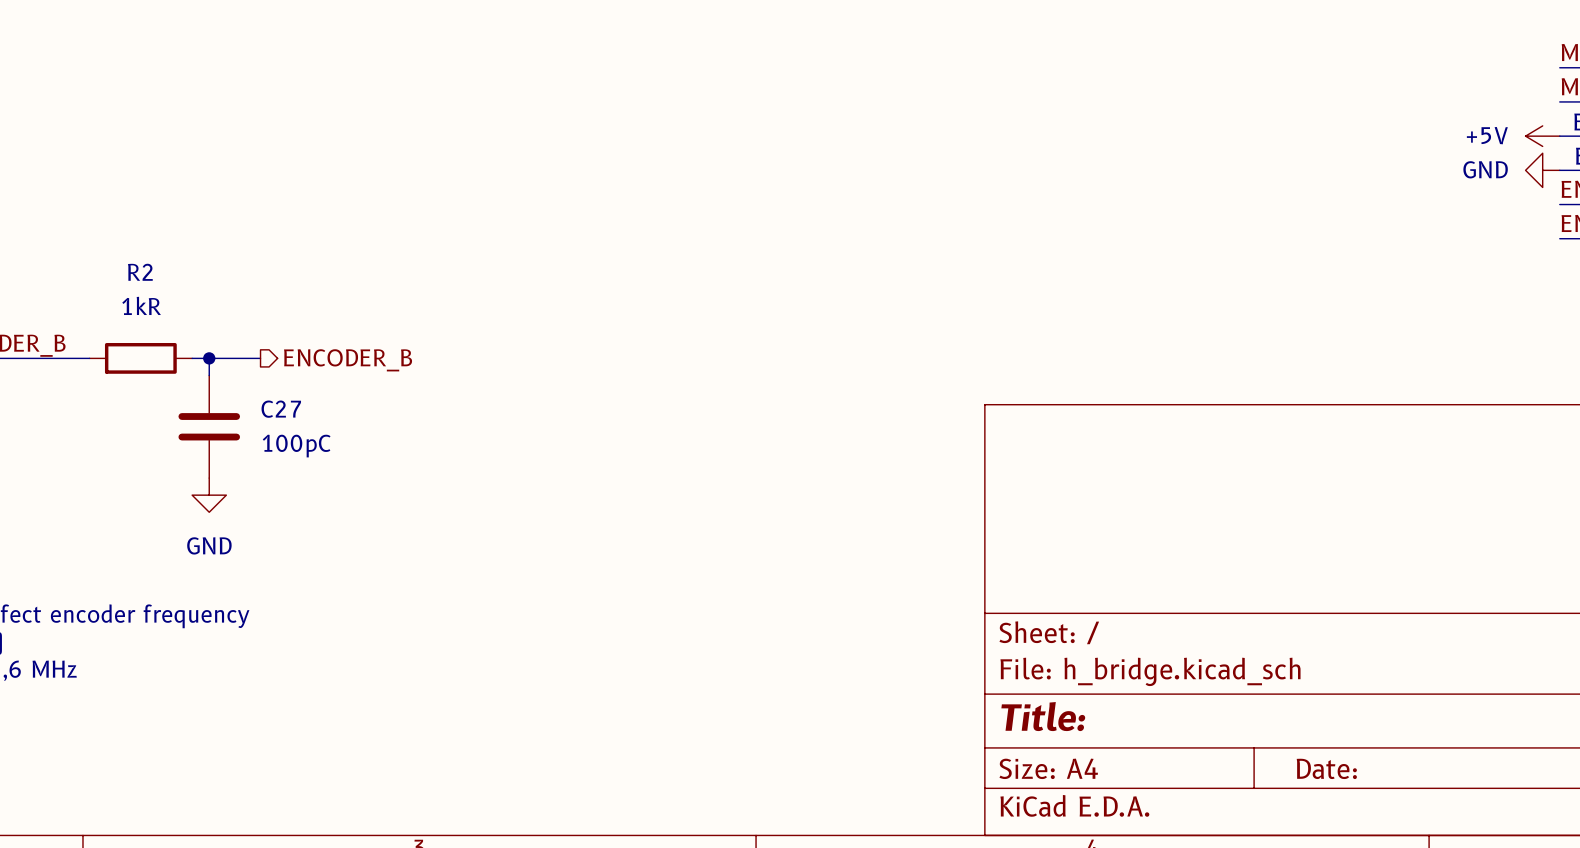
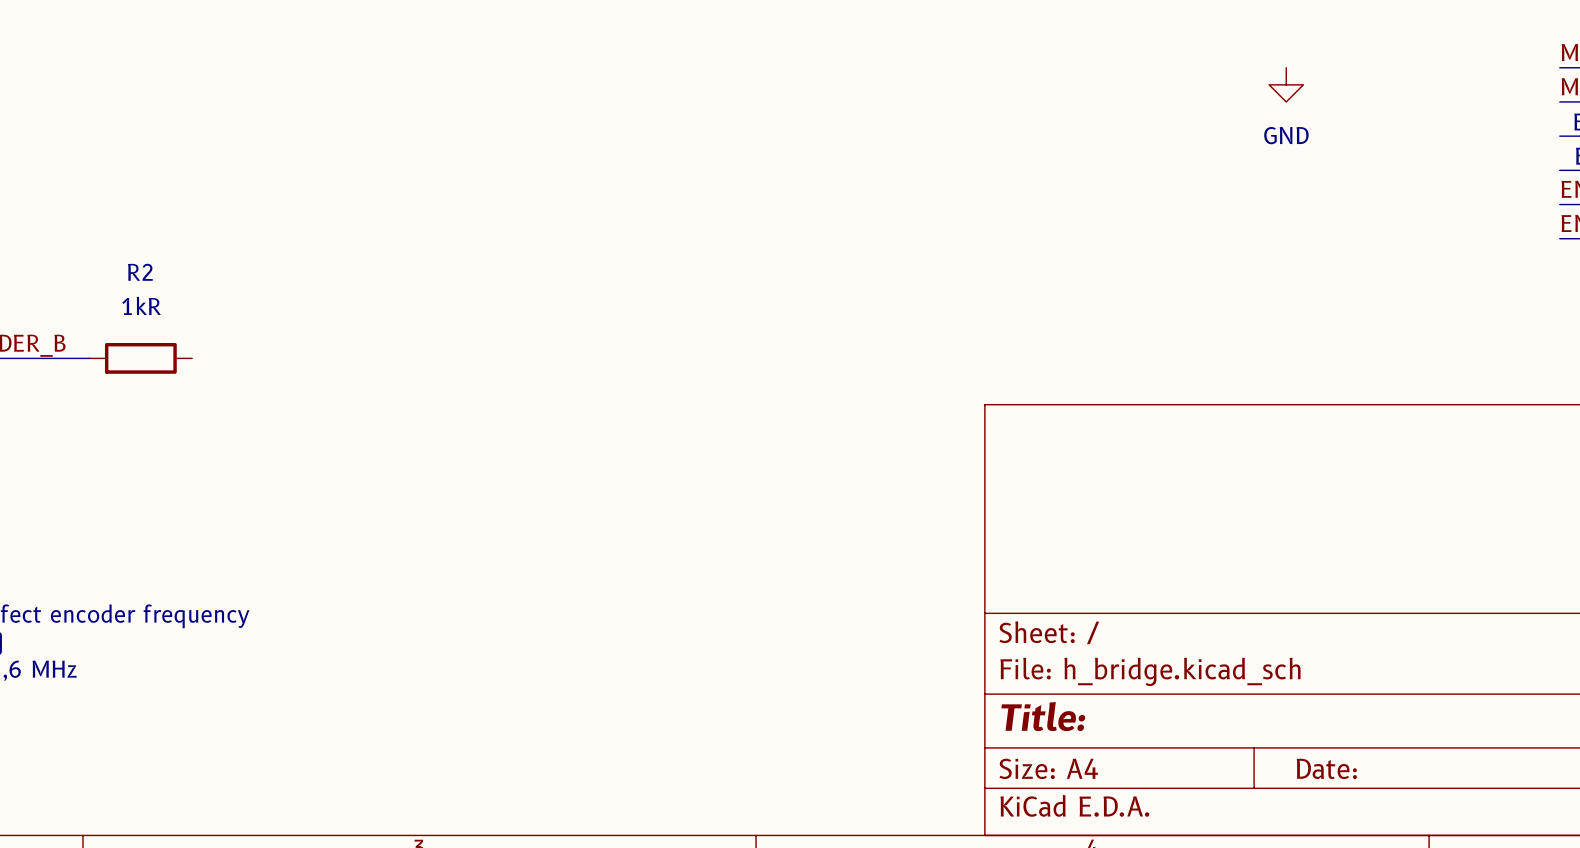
power symbol: none -> GND (1286, 84)
power symbol: +5V (1542, 136) -> none
power symbol: GND (1542, 170) -> none
wire: (192, 358) (260, 358) -> none
wire: (209, 358) (209, 375) -> none
junction: (209, 358) -> none
hierarchical label: ENCODER_B (348, 360) -> none
C27: 100pC (209, 426) -> none
power symbol: GND (209, 495) -> none

